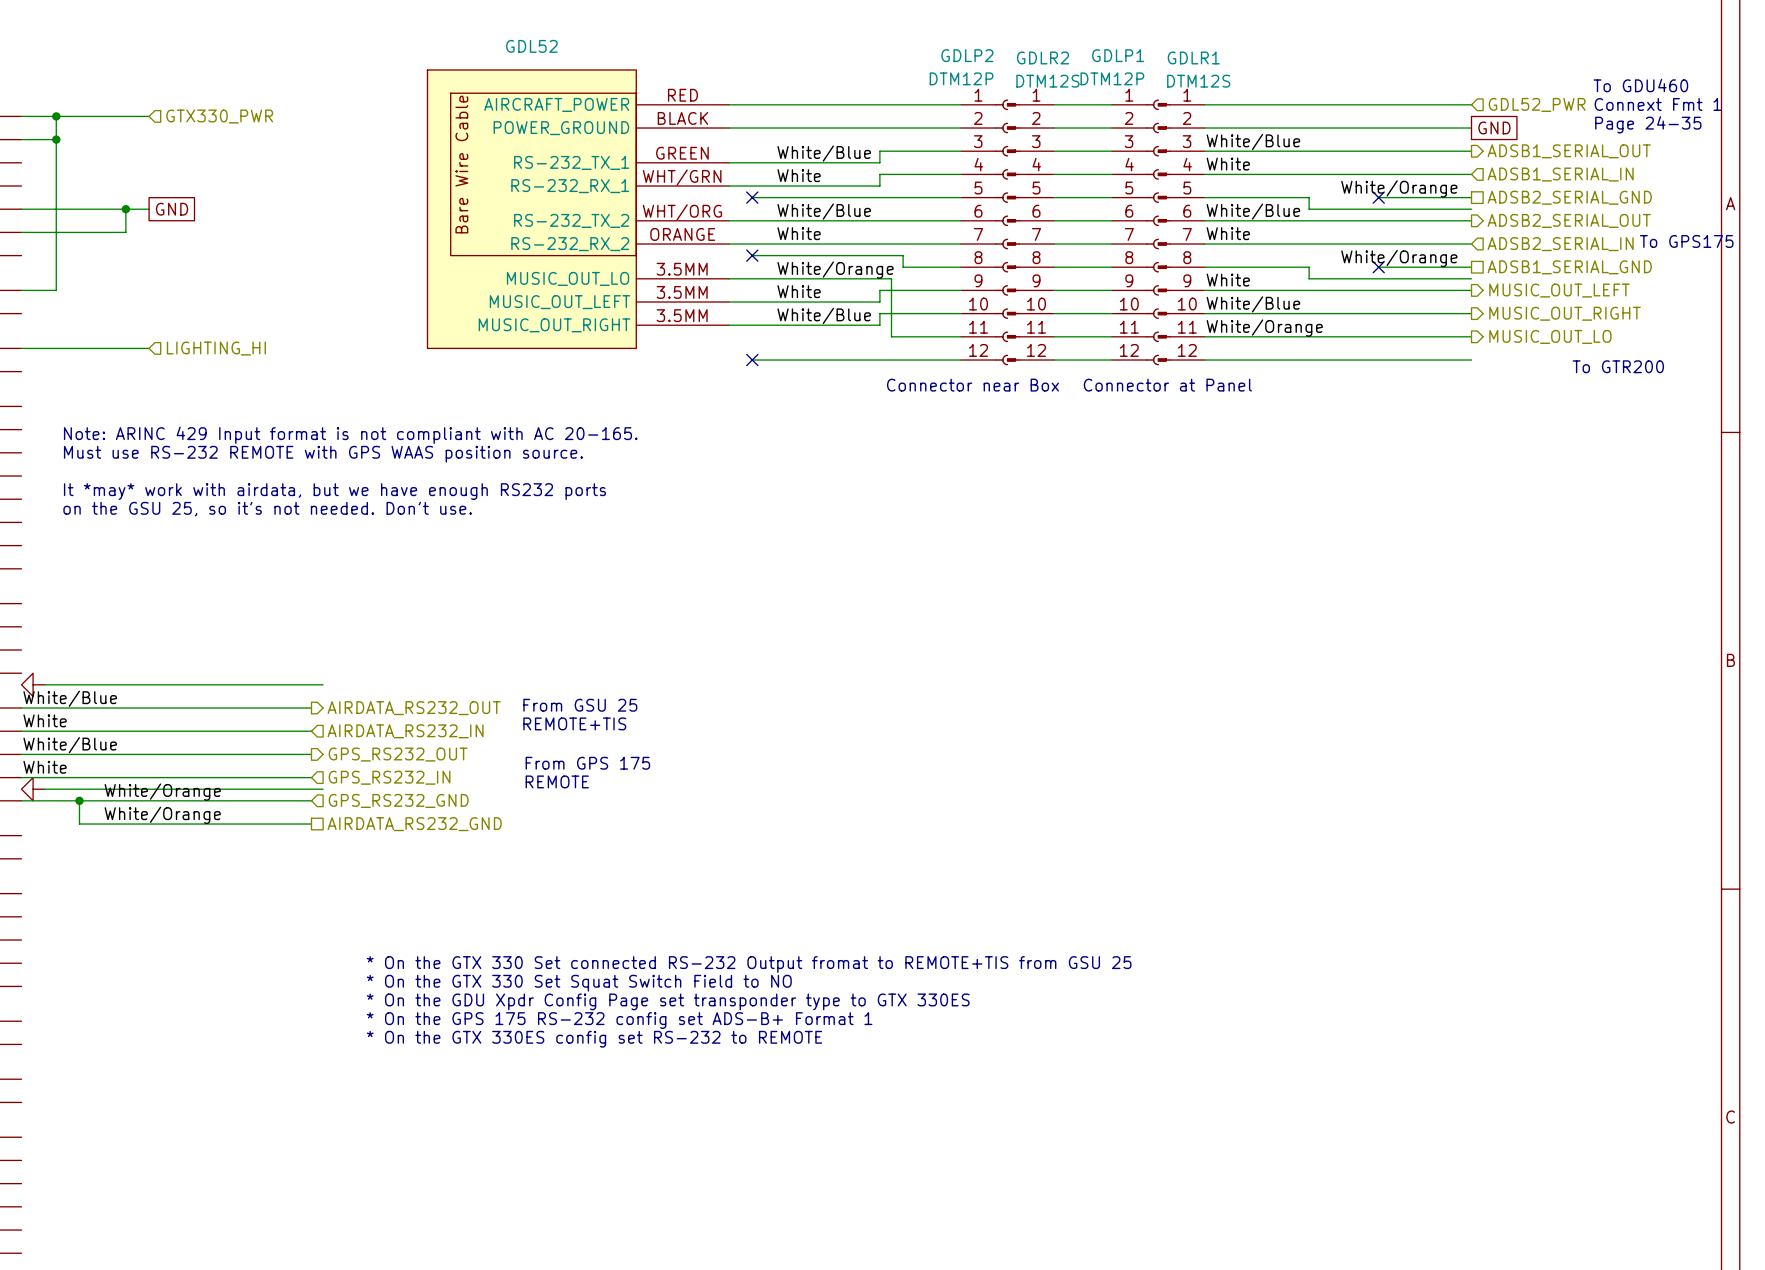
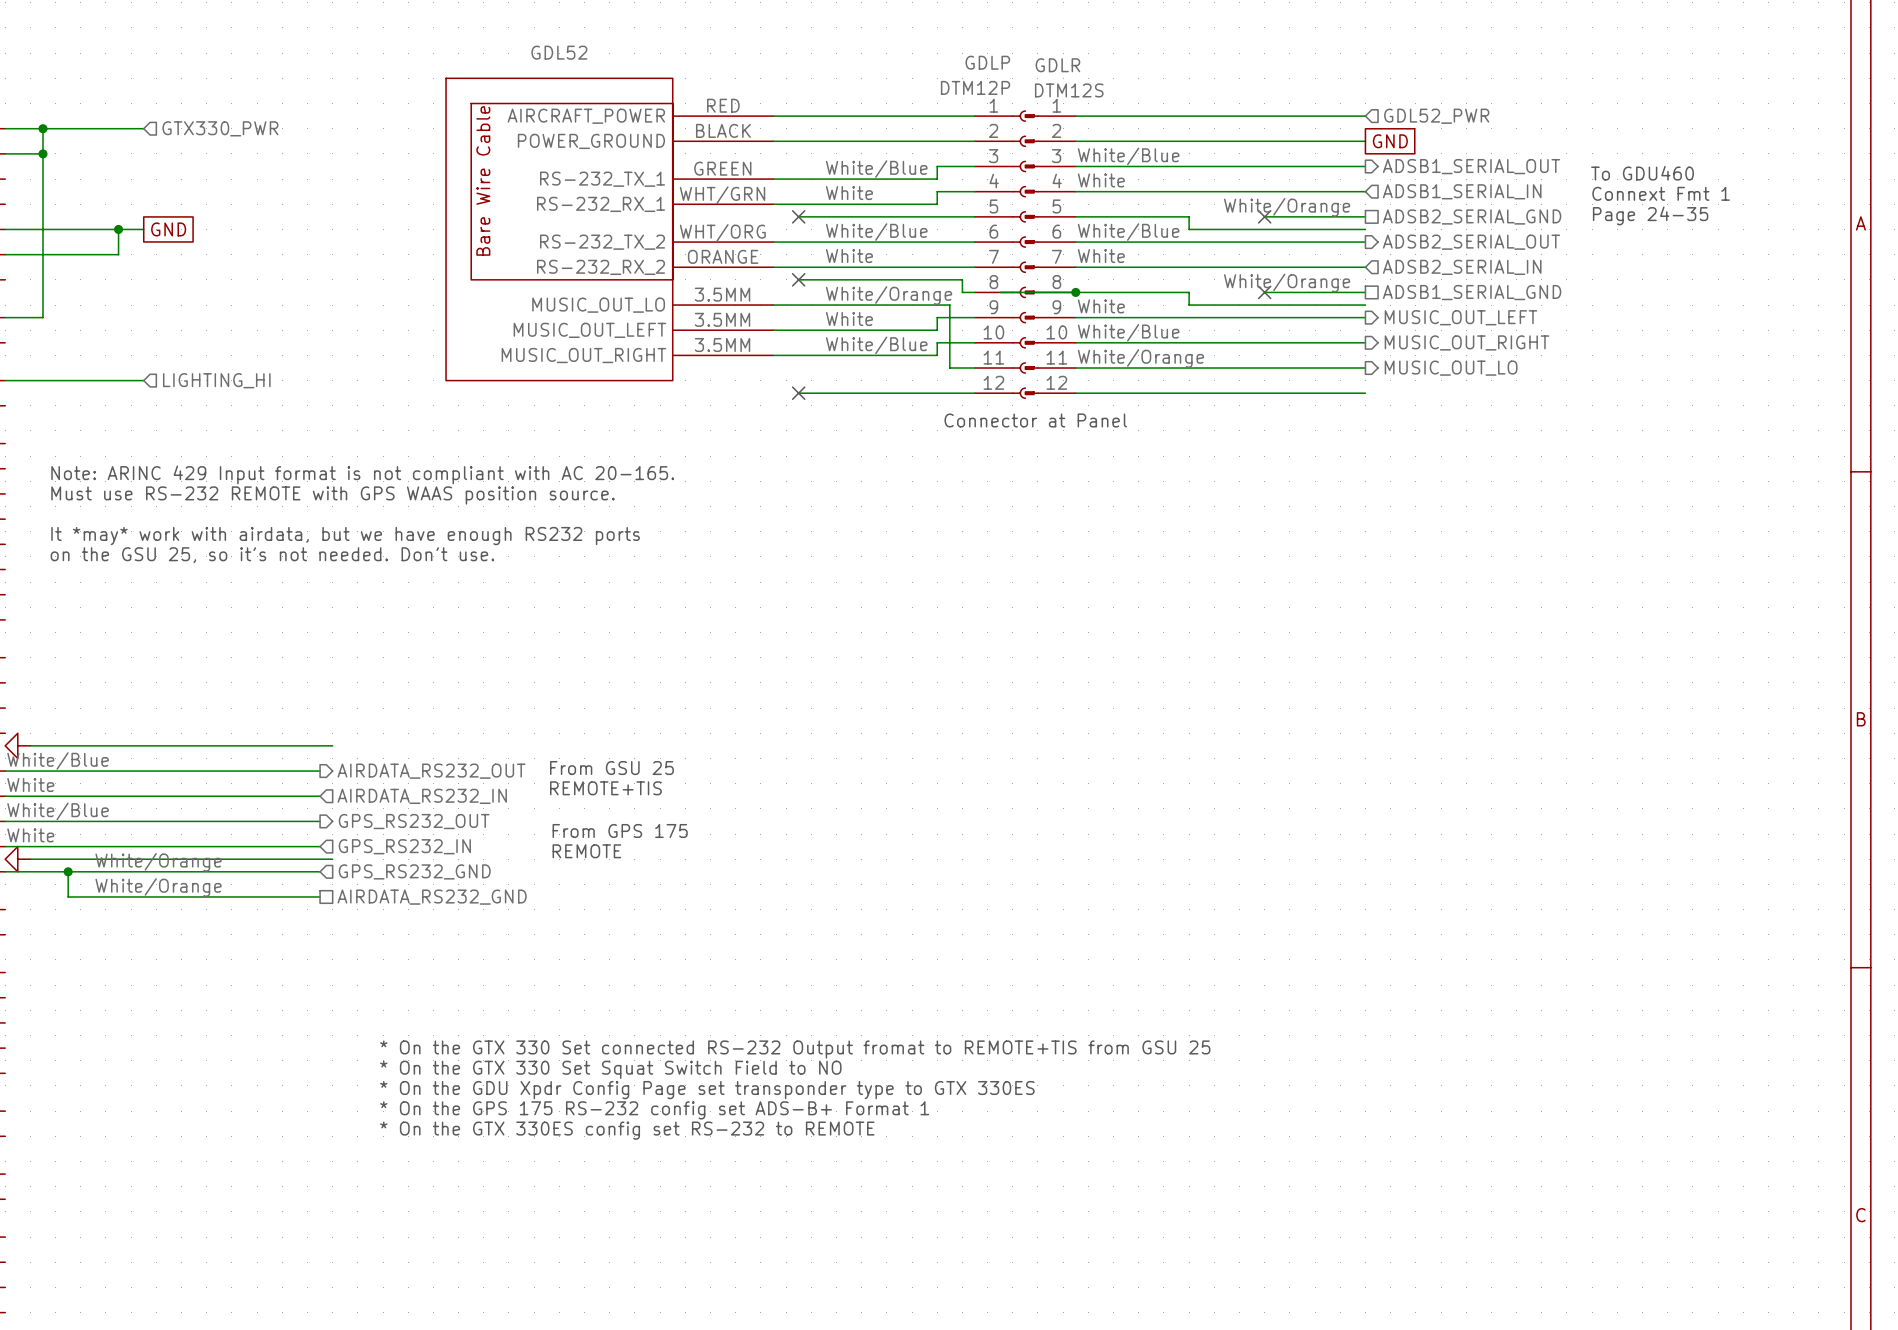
text position: To GDU460 (1640, 85) -> To GDU460 (1642, 173)
wire: (1274, 104) (1471, 104) -> none
hierarchical label position: GDL52_PWR (1537, 104) -> GDL52_PWR (1436, 116)
text position: Connext Fmt 1 (1657, 104) -> Connext Fmt 1 (1661, 193)
text position: Page 24-35 (1648, 124) -> Page 24-35 (1650, 215)
wire: (1274, 128) (1471, 128) -> none
global label position: GND (1494, 128) -> GND (1390, 141)
label: none -> White/Blue (1128, 156)
label: White/Blue (1253, 141) -> none
wire: (1274, 151) (1471, 151) -> none
hierarchical label position: ADSB1_SERIAL_OUT (1569, 151) -> ADSB1_SERIAL_OUT (1471, 166)
label: none -> White (1101, 180)
label: White (1228, 164) -> none
wire: (1274, 174) (1471, 174) -> none
hierarchical label position: ADSB1_SERIAL_IN (1560, 174) -> ADSB1_SERIAL_IN (1462, 191)
label: White/Orange (1399, 188) -> none
wire: none -> (1189, 216) (1189, 229) (1365, 229)
no-connect mark: none -> (1264, 216)
wire: (1274, 197) (1309, 197) (1309, 209) (1471, 209) -> none
wire: (1378, 197) (1471, 197) -> none
no-connect mark: (1378, 197) -> none
hierarchical label position: ADSB2_SERIAL_GND (1569, 197) -> ADSB2_SERIAL_GND (1472, 216)
label: none -> White/Blue (1128, 232)
label: White/Blue (1253, 211) -> White/Orange (1287, 207)
wire: (1274, 220) (1471, 220) -> none
hierarchical label position: ADSB2_SERIAL_OUT (1569, 220) -> ADSB2_SERIAL_OUT (1471, 242)
GDLP: none -> DTM12P (1000, 254)
GDLR: none -> DTM12S (1050, 254)
GDLP2: DTM12P (984, 232) -> none
GDLR2: DTM12S (1030, 232) -> none
GDLP1: DTM12P (1135, 232) -> none
GDLR1: DTM12S (1181, 232) -> none
label: none -> White (1101, 256)
label: White (1228, 233) -> none
text: To GPS175 (1686, 241) -> none
wire: (1274, 244) (1471, 244) -> none
hierarchical label position: ADSB2_SERIAL_IN (1560, 244) -> ADSB2_SERIAL_IN (1462, 267)
label: none -> White/Orange (1287, 282)
label: White/Orange (1399, 258) -> none
junction: none -> (1075, 292)
wire: none -> (1189, 292) (1189, 305) (1365, 305)
no-connect mark: none -> (1264, 292)
wire: (1274, 267) (1309, 267) (1309, 278) (1471, 278) -> none
wire: (1378, 267) (1471, 267) -> none
no-connect mark: (1378, 267) -> none
hierarchical label position: ADSB1_SERIAL_GND (1569, 267) -> ADSB1_SERIAL_GND (1472, 292)
label: none -> White (1101, 306)
label: White (1228, 280) -> none
wire: (1274, 290) (1471, 290) -> none
hierarchical label position: MUSIC_OUT_LEFT (1559, 290) -> MUSIC_OUT_LEFT (1461, 317)
label: none -> White/Blue (1128, 332)
label: White/Blue (1253, 304) -> none
wire: (1274, 313) (1471, 313) -> none
hierarchical label position: MUSIC_OUT_RIGHT (1565, 313) -> MUSIC_OUT_RIGHT (1467, 342)
label: none -> White/Orange (1140, 358)
label: White/Orange (1264, 328) -> none
wire: (1274, 336) (1471, 336) -> none
hierarchical label position: MUSIC_OUT_LO (1550, 336) -> MUSIC_OUT_LO (1451, 368)
wire: (1274, 360) (1471, 360) -> none
text: To GTR200 (1618, 366) -> none
text: Connector near Box (972, 385) -> none
text position: Connector at Panel (1167, 385) -> Connector at Panel (1035, 420)

